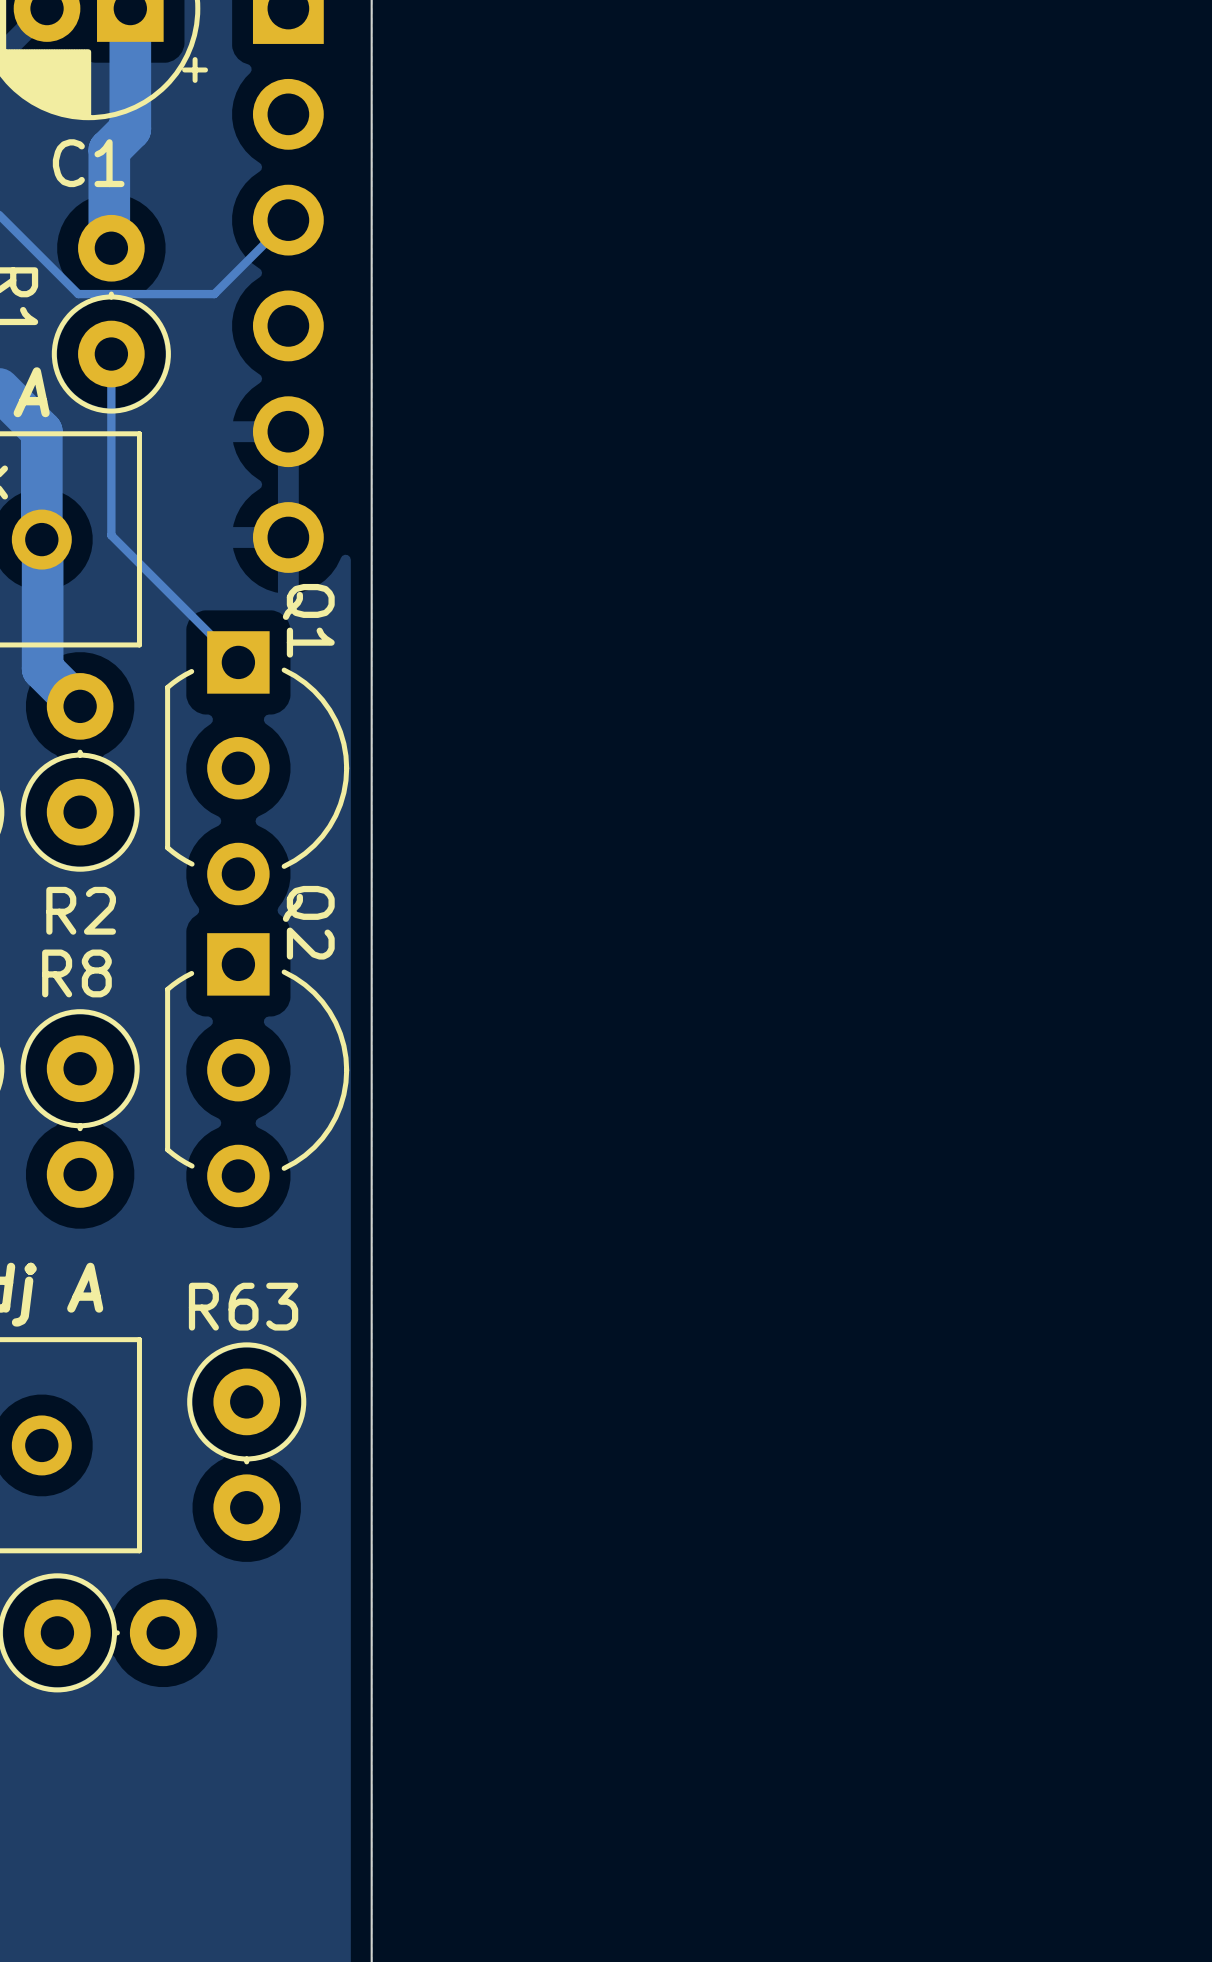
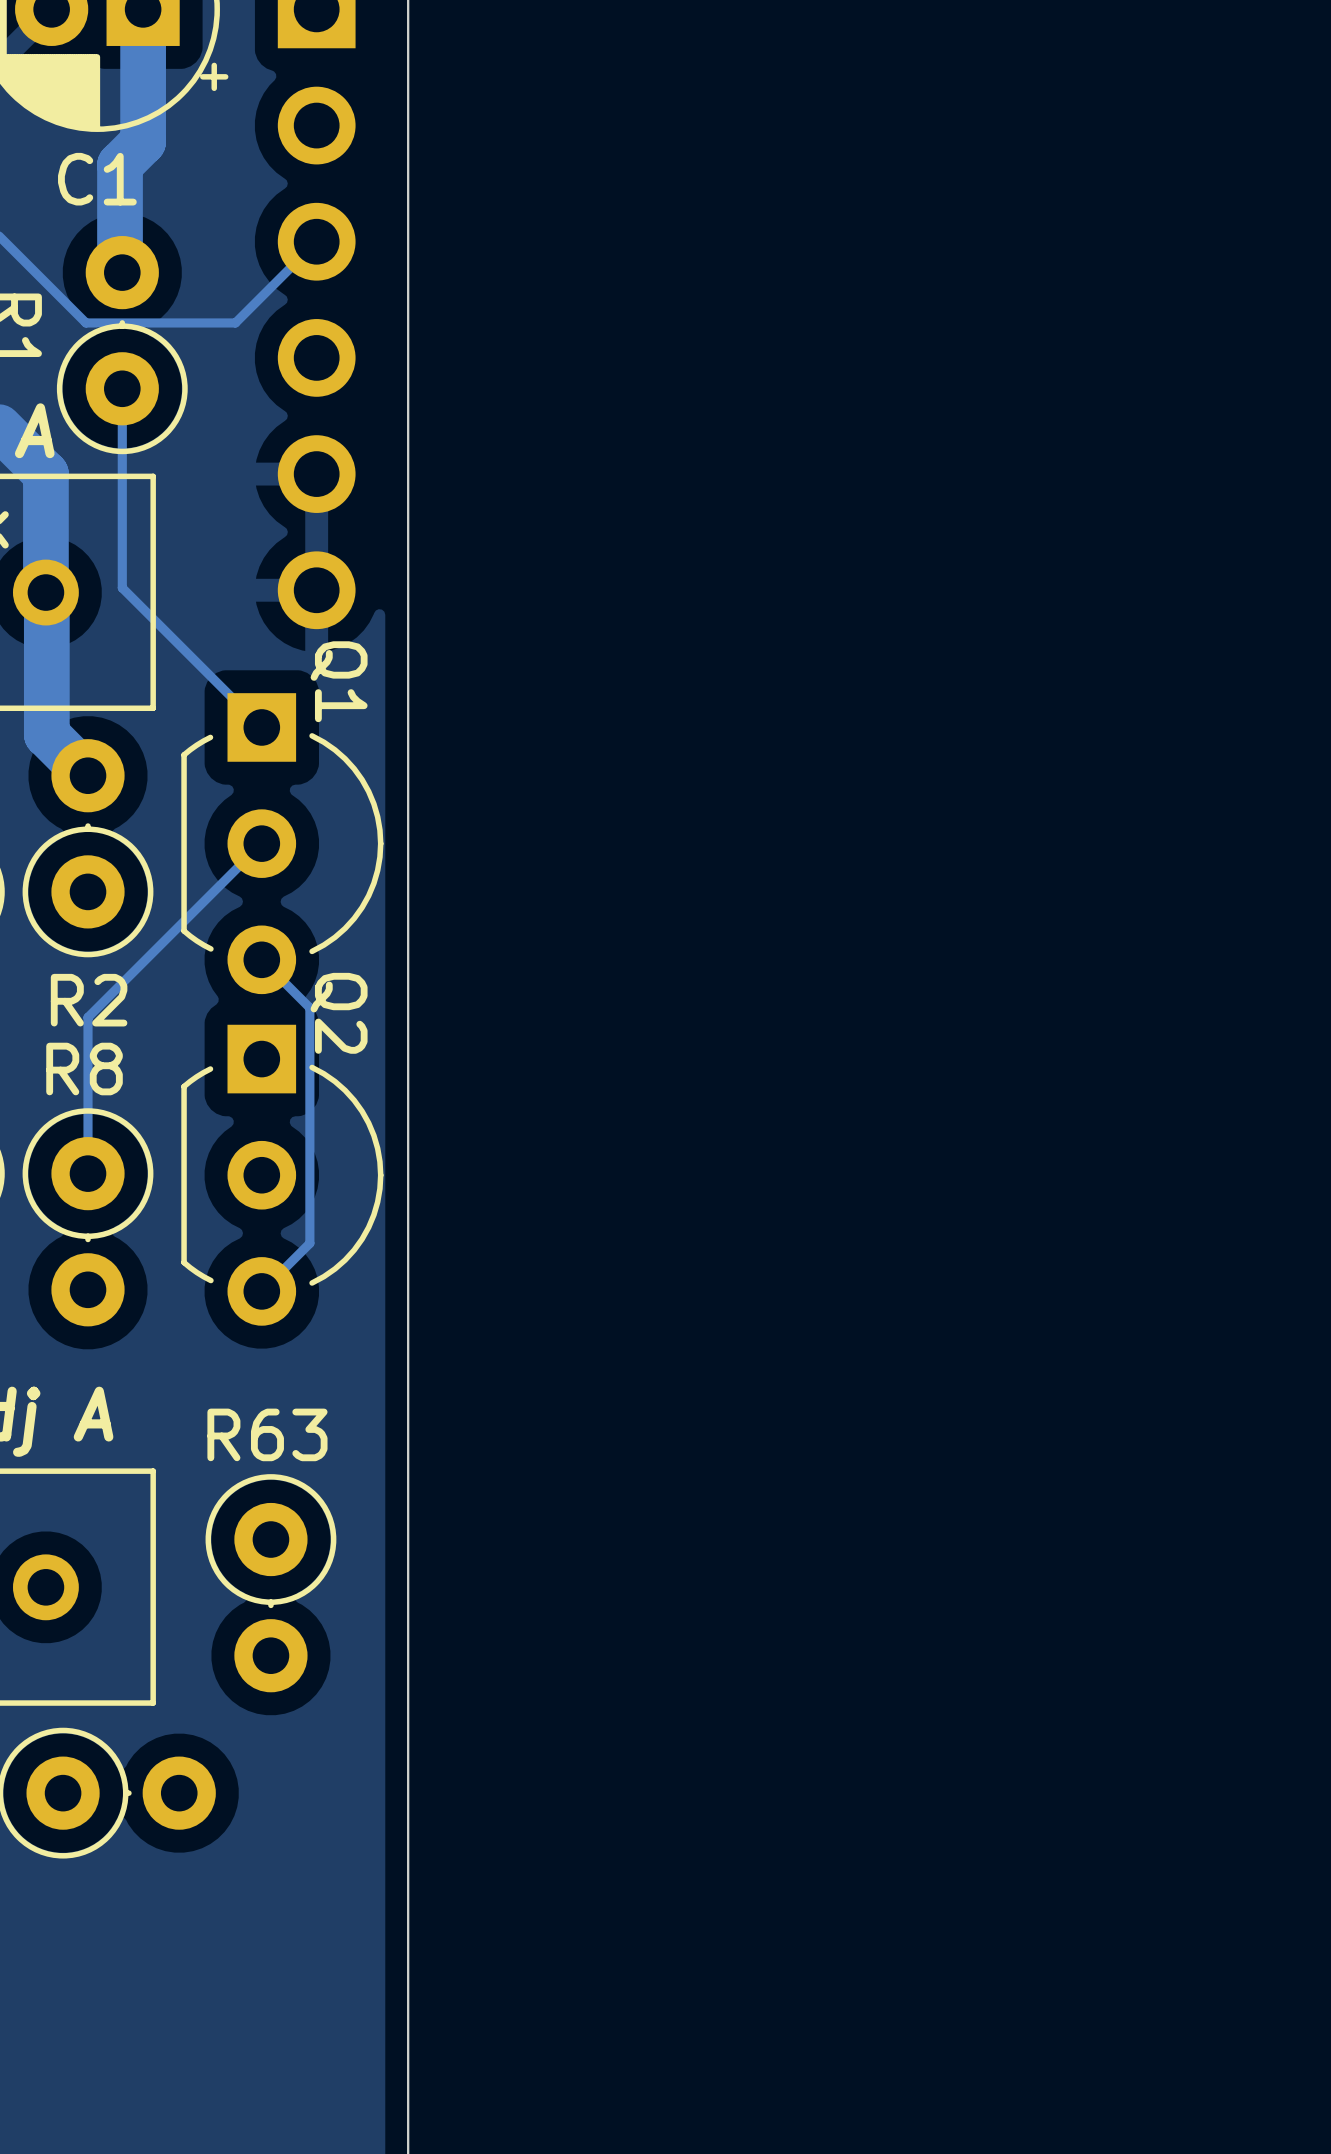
track: none -> (261, 843) (88, 1017) (88, 1173)
track: none -> (261, 959) (309, 1007) (309, 1243) (261, 1291)

